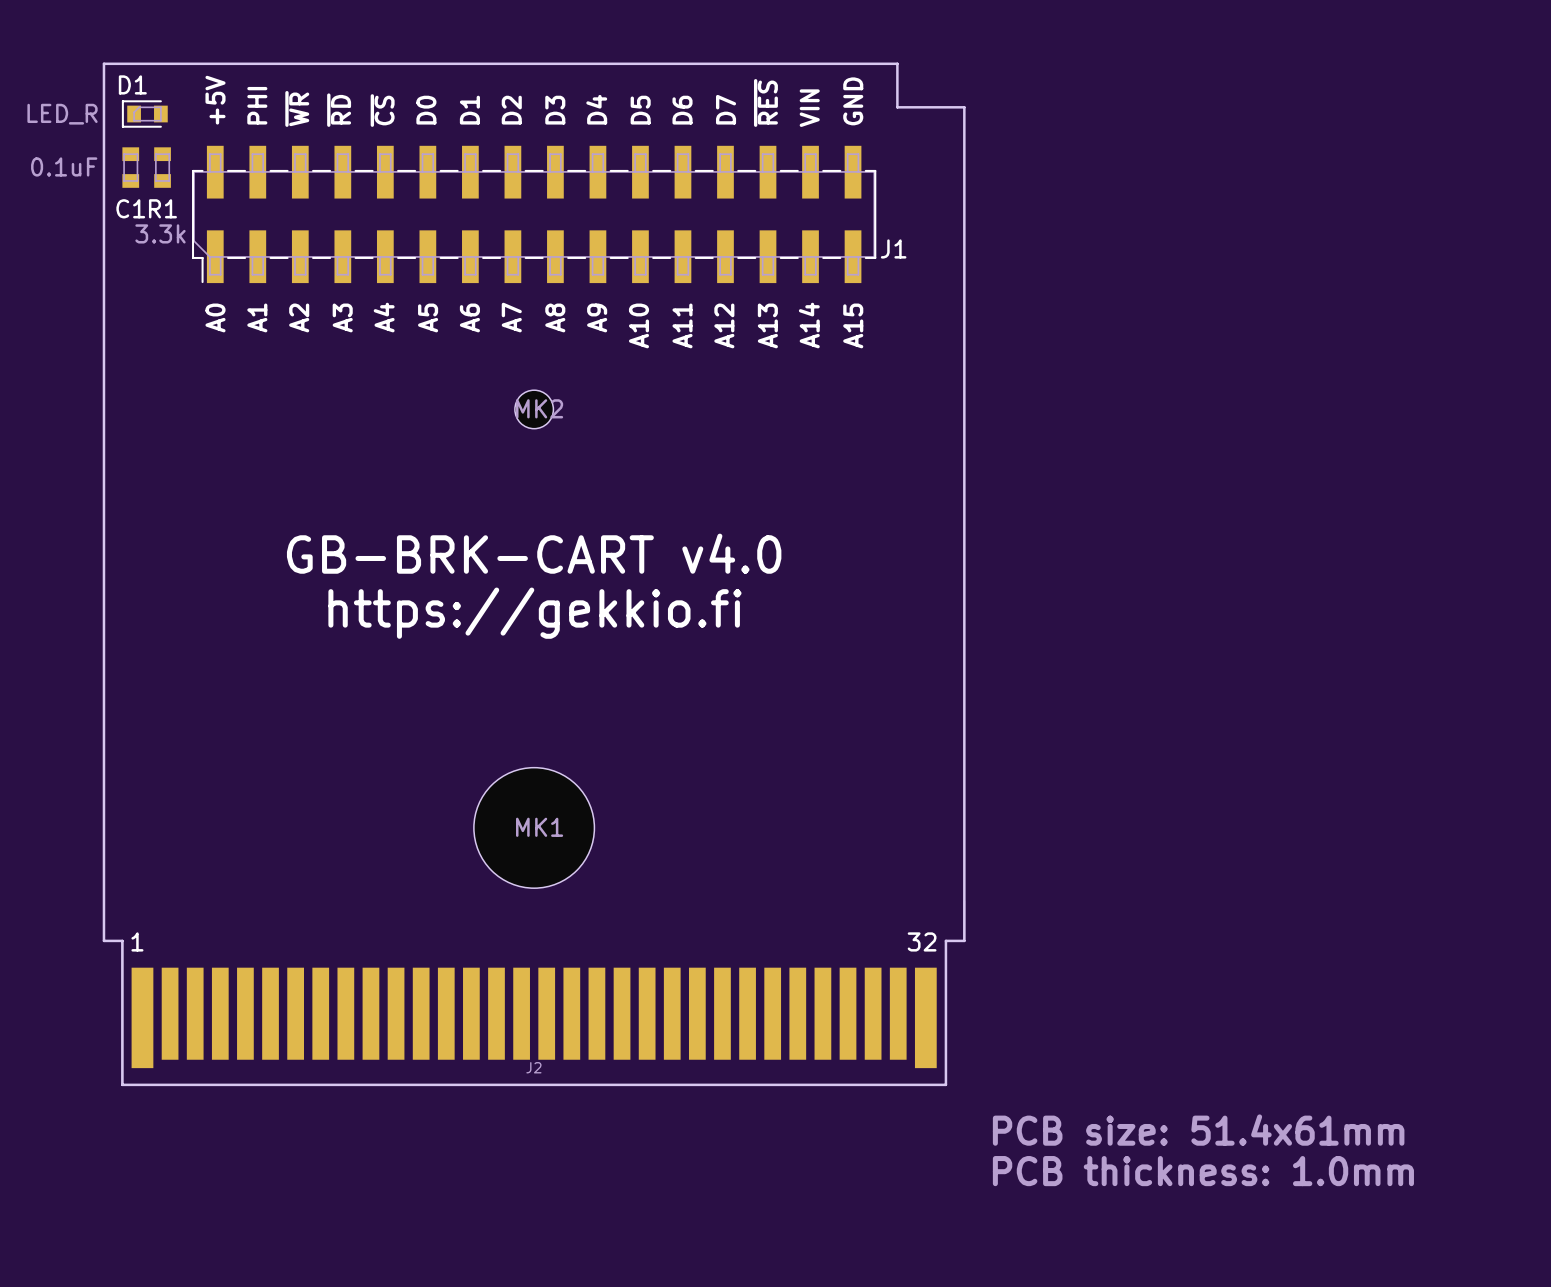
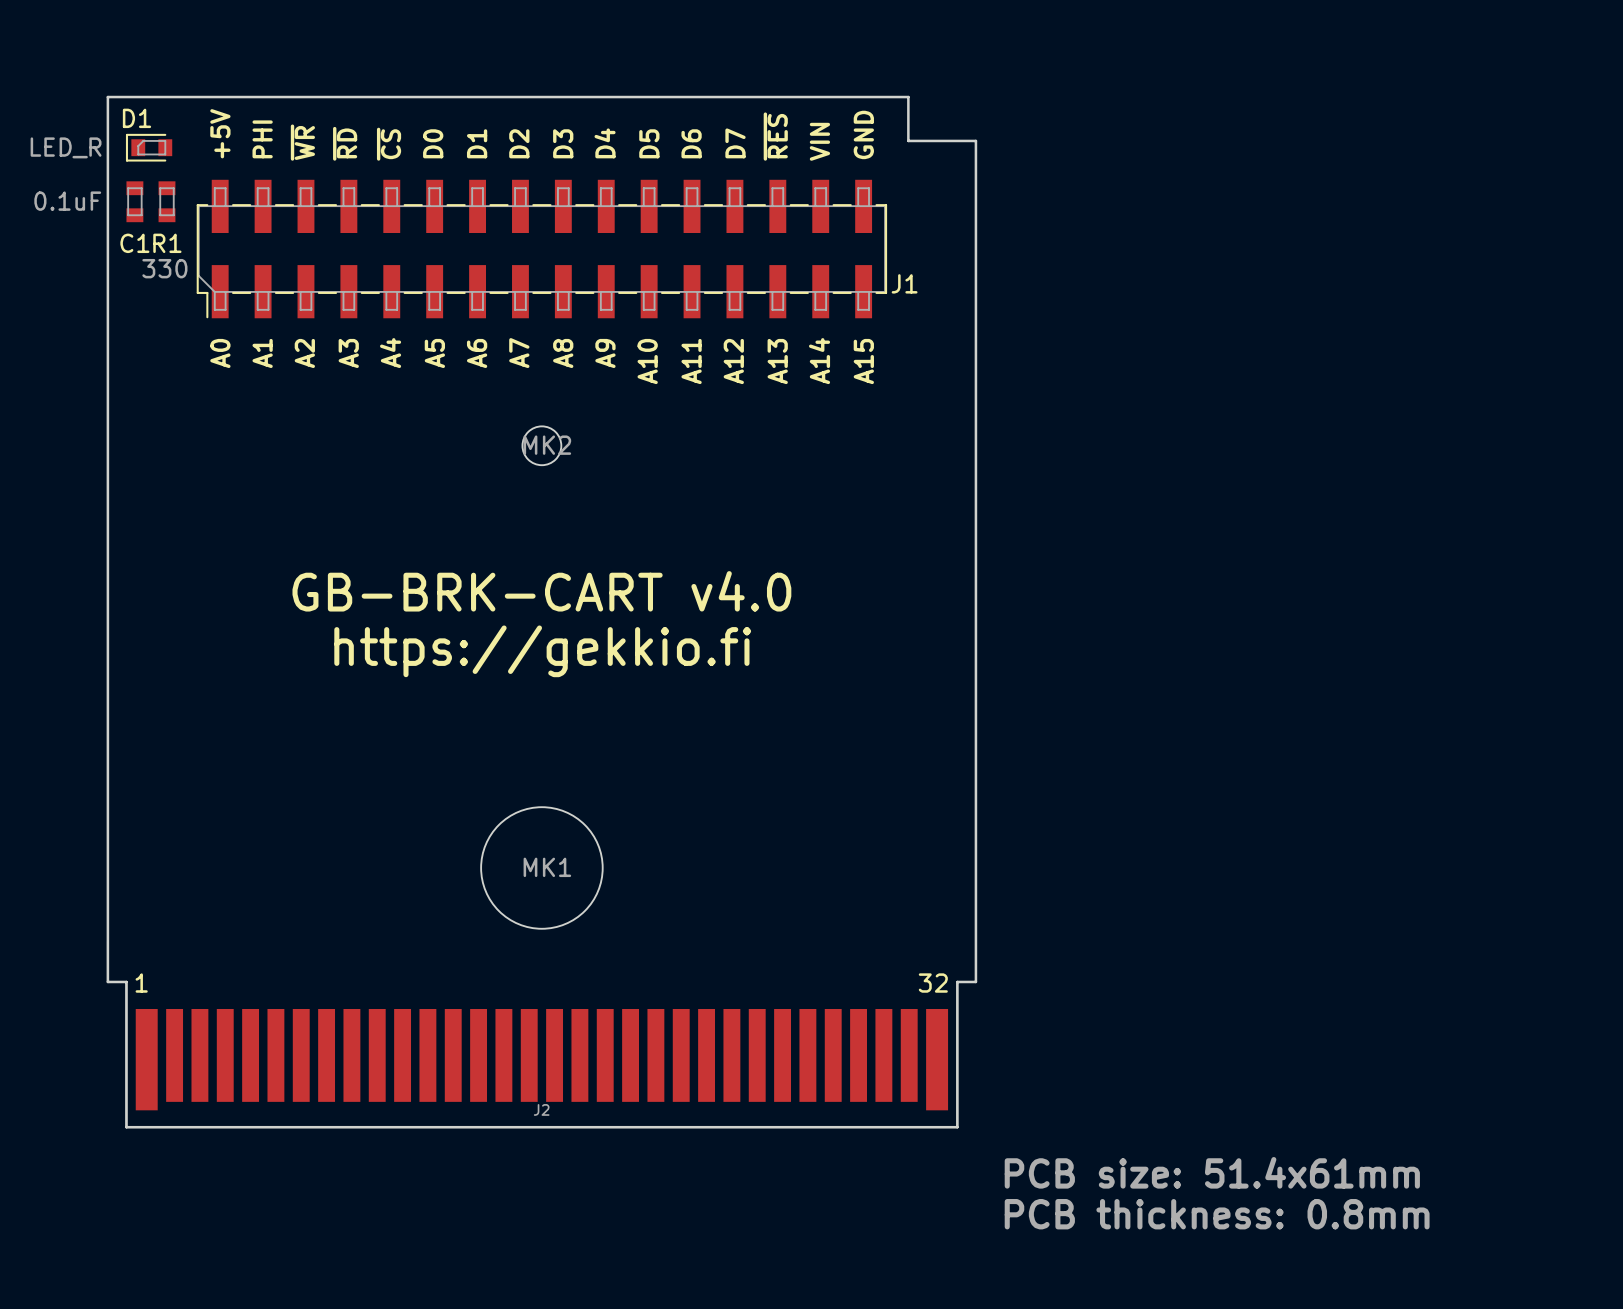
R1 value: 3.3k (160, 233) -> 330 (164, 268)
text: PCB thickness: 1.0mm (1203, 1171) -> PCB thickness: 0.8mm (1217, 1214)

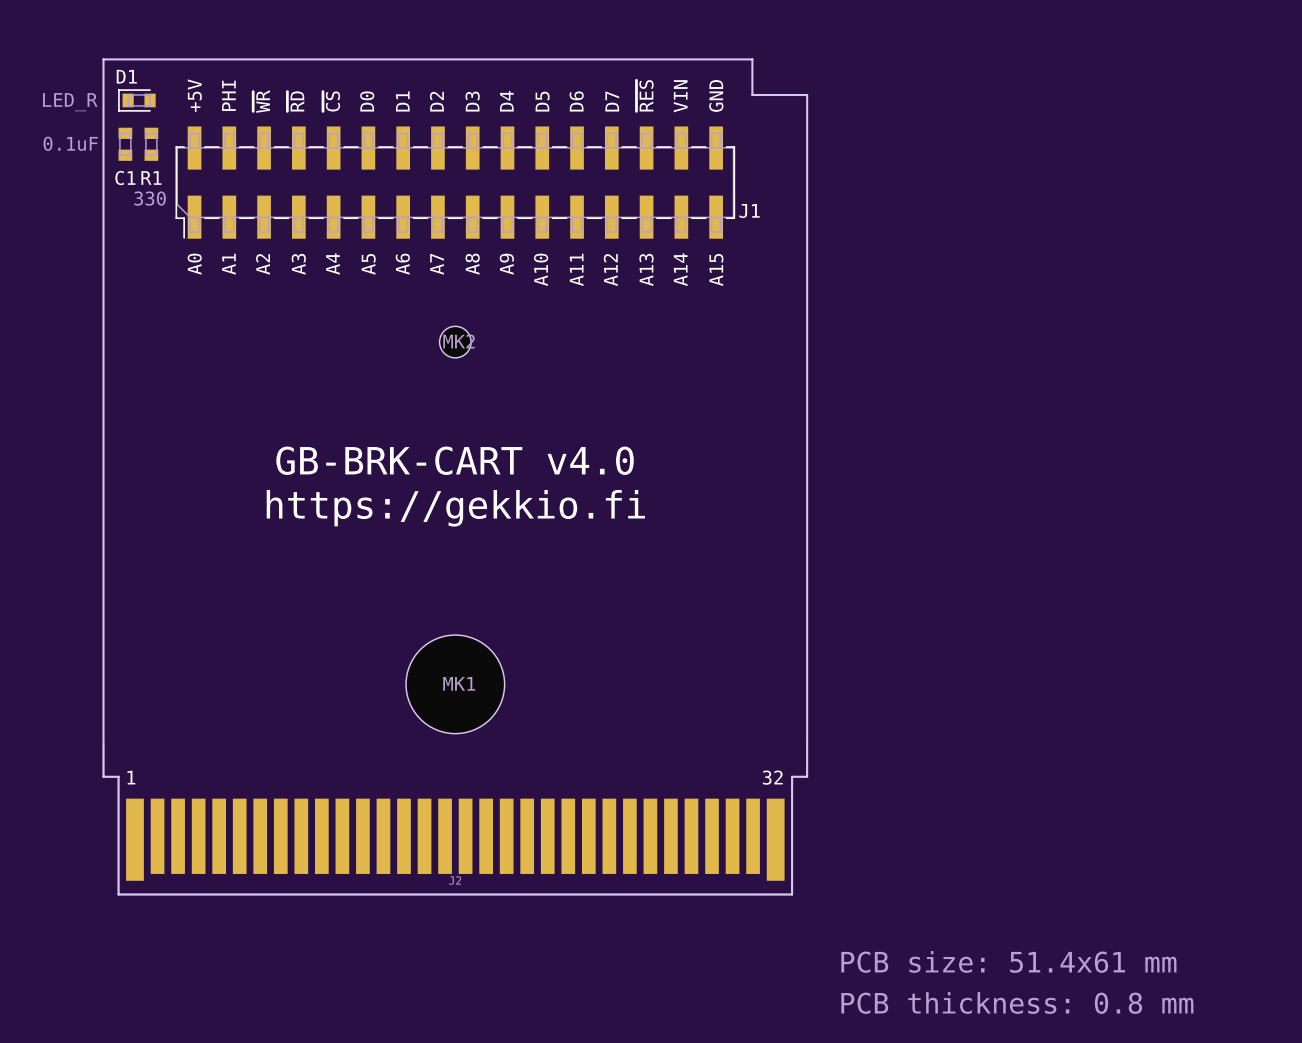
text: PCB size: 51.4x61mm (1212, 1172) -> PCB size: 51.4x61 mm (1008, 961)
text: PCB thickness: 0.8mm (1217, 1214) -> PCB thickness: 0.8 mm (1017, 1003)

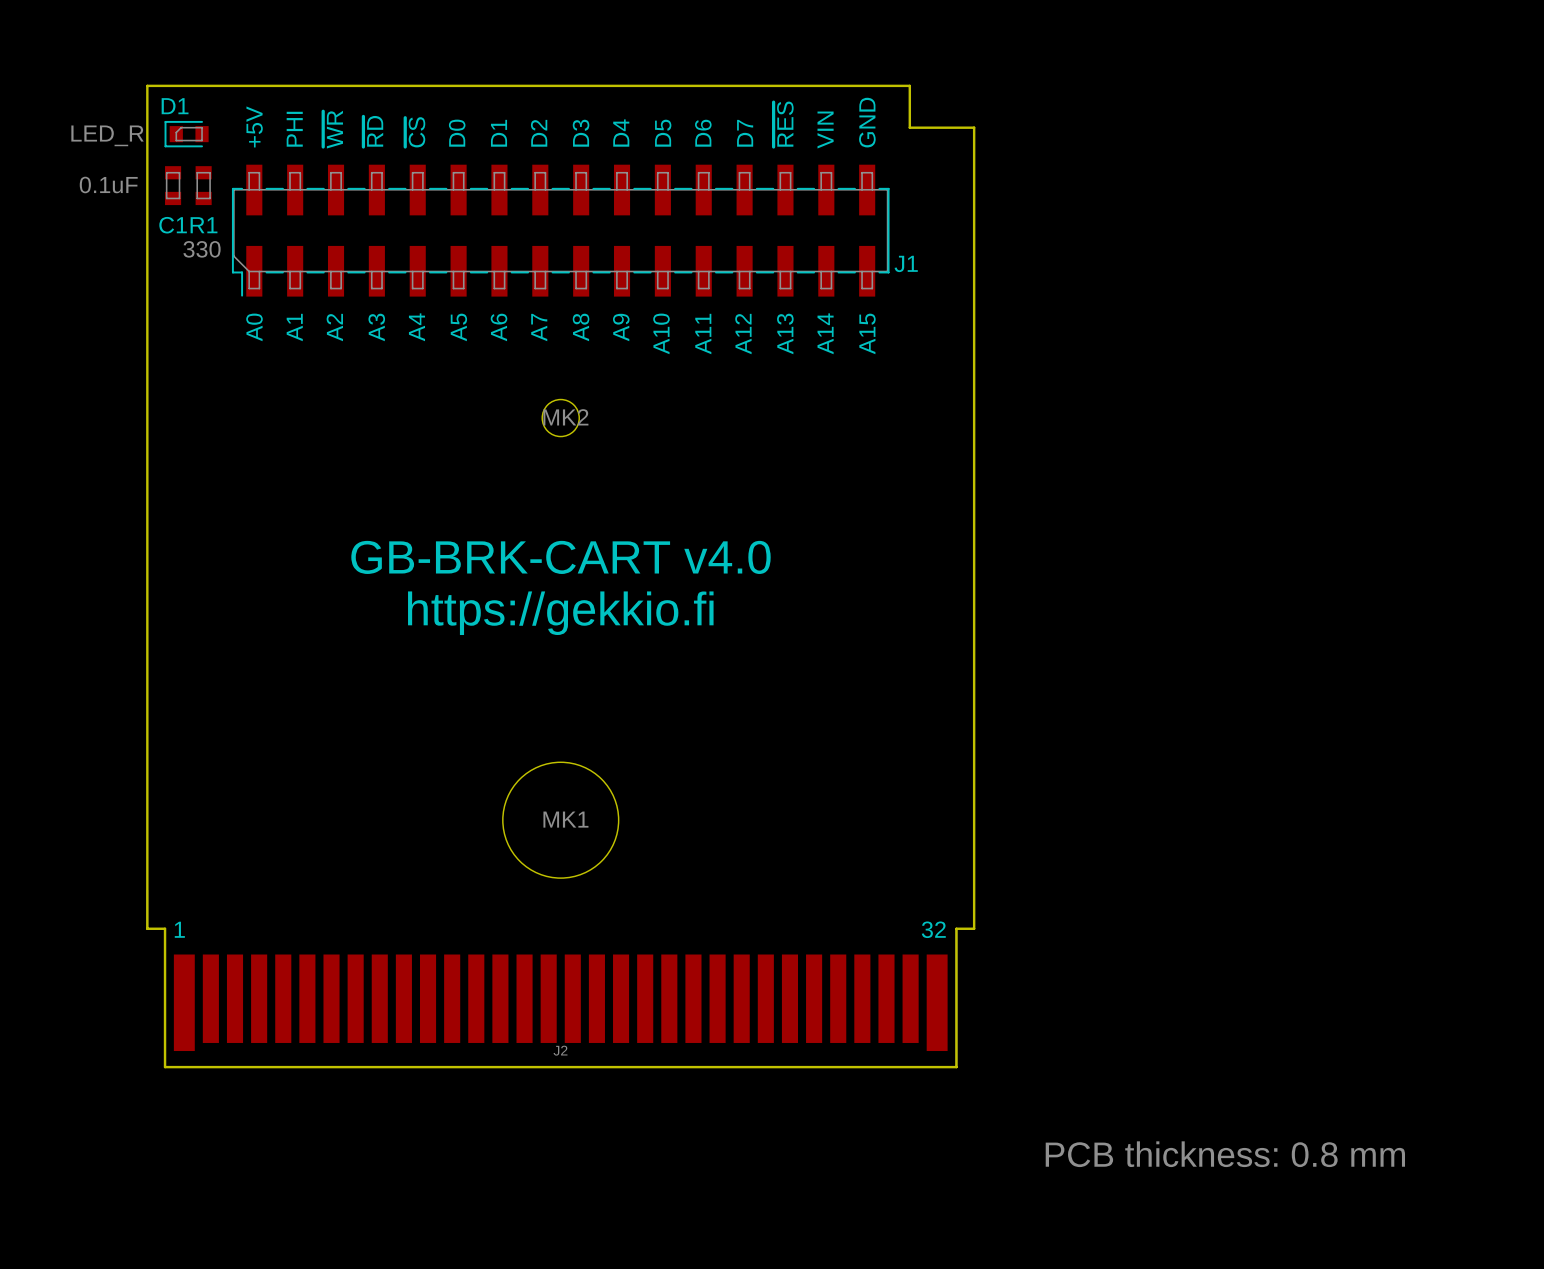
text: PCB size: 51.4x61 mm (1008, 961) -> none
text position: PCB thickness: 0.8 mm (1017, 1003) -> PCB thickness: 0.8 mm (1225, 1154)

